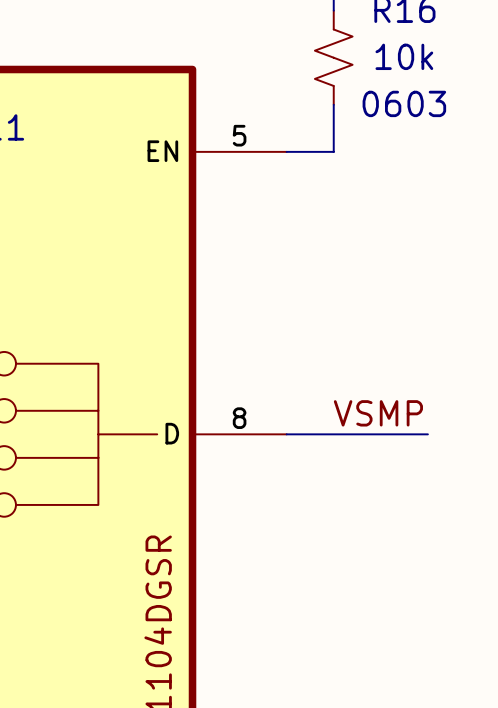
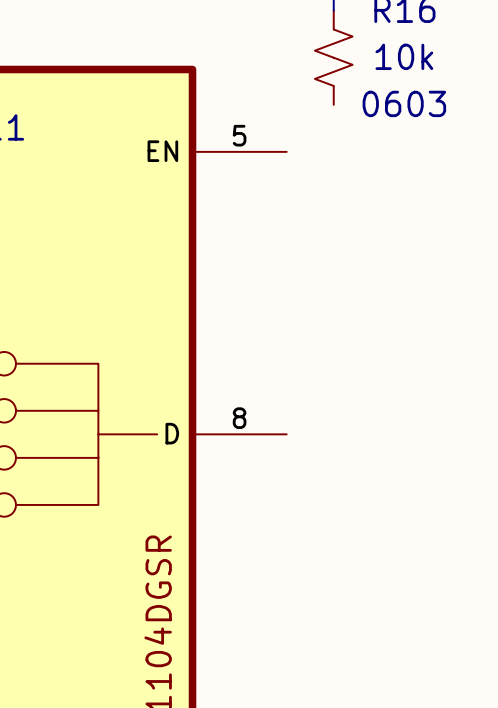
wire: (333, 104) (333, 151) (286, 151) -> none
label: VSMP (378, 413) -> none
wire: (286, 434) (427, 434) -> none

